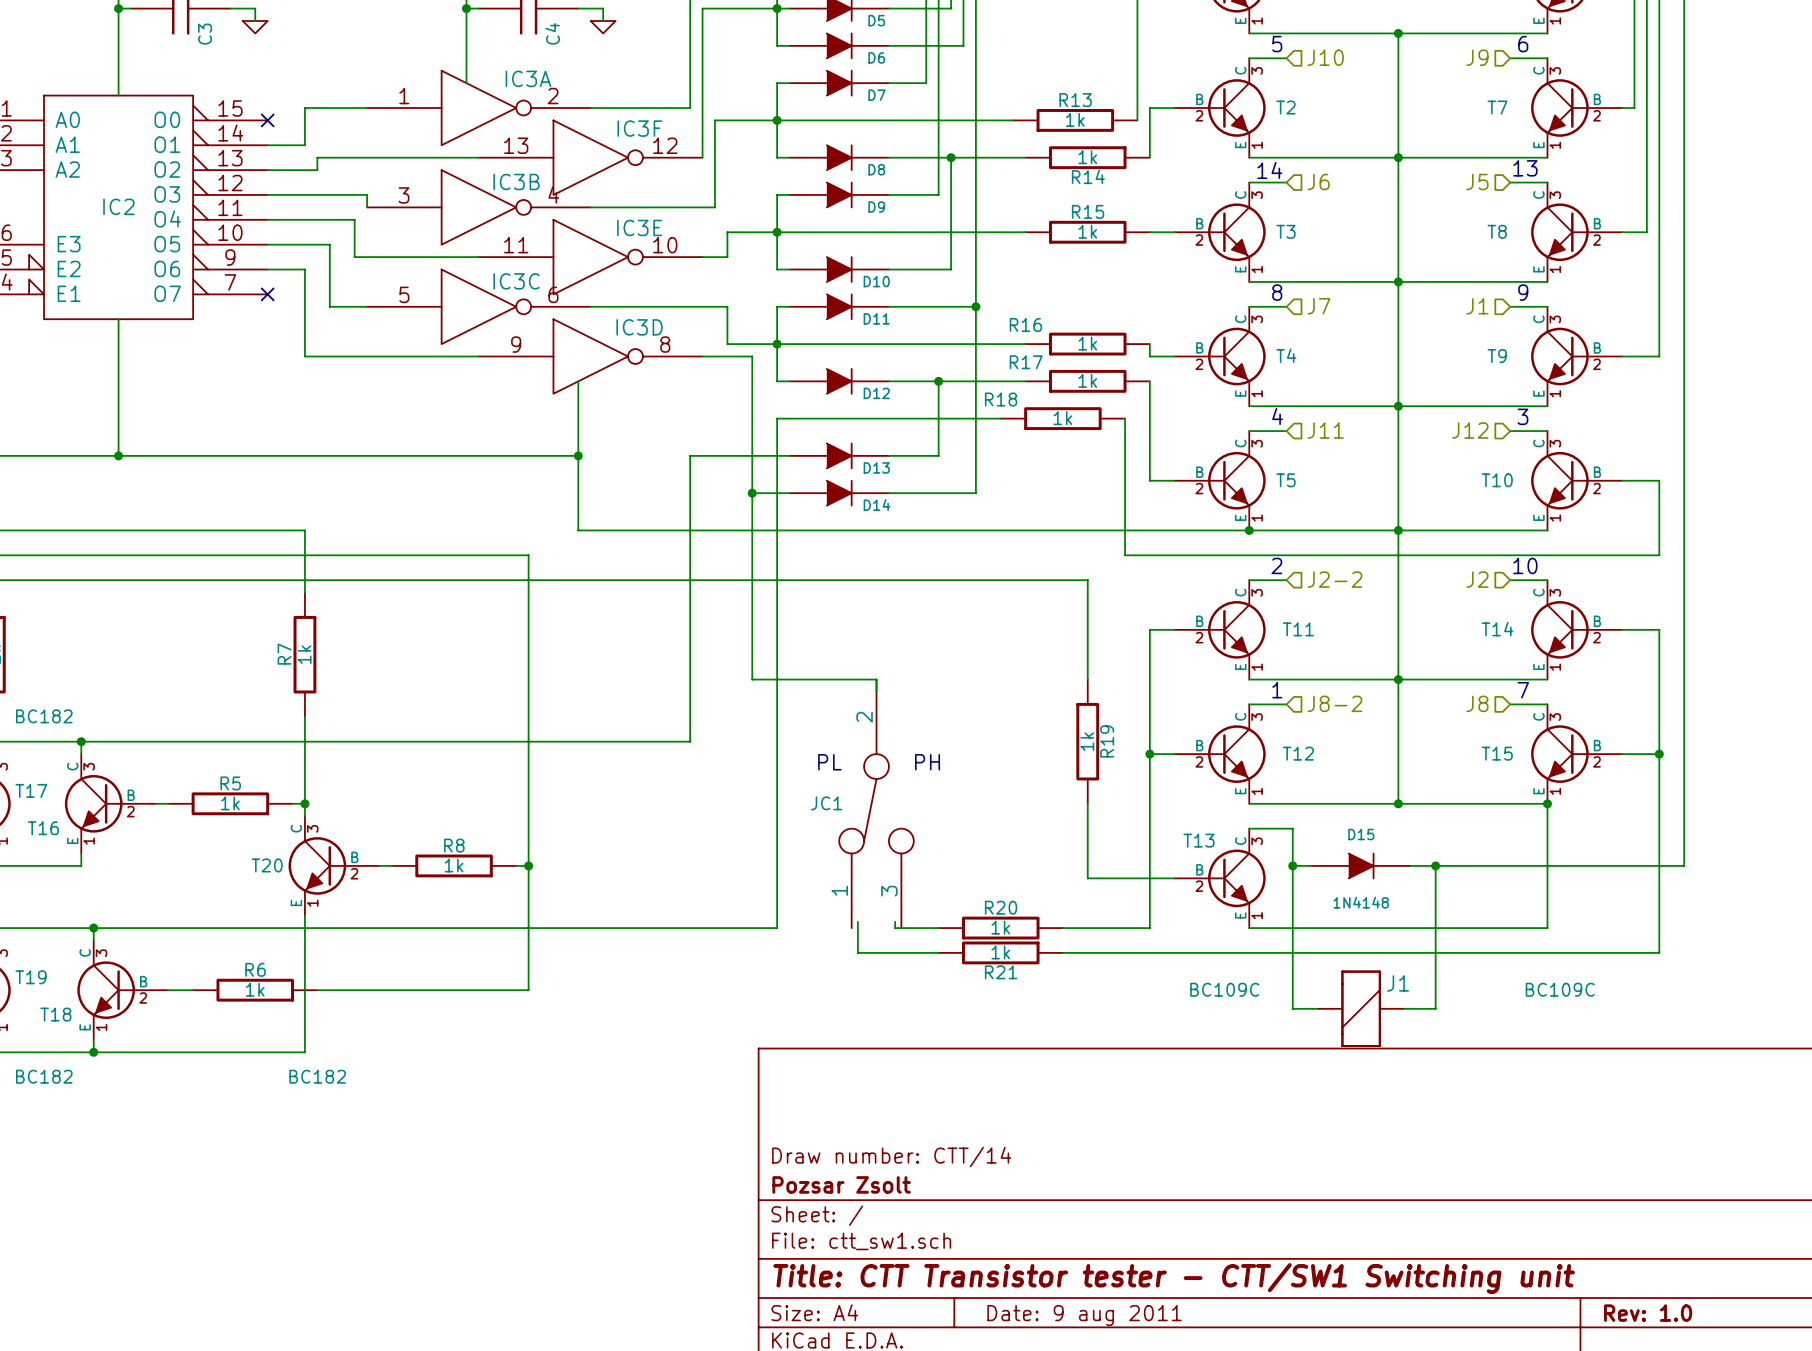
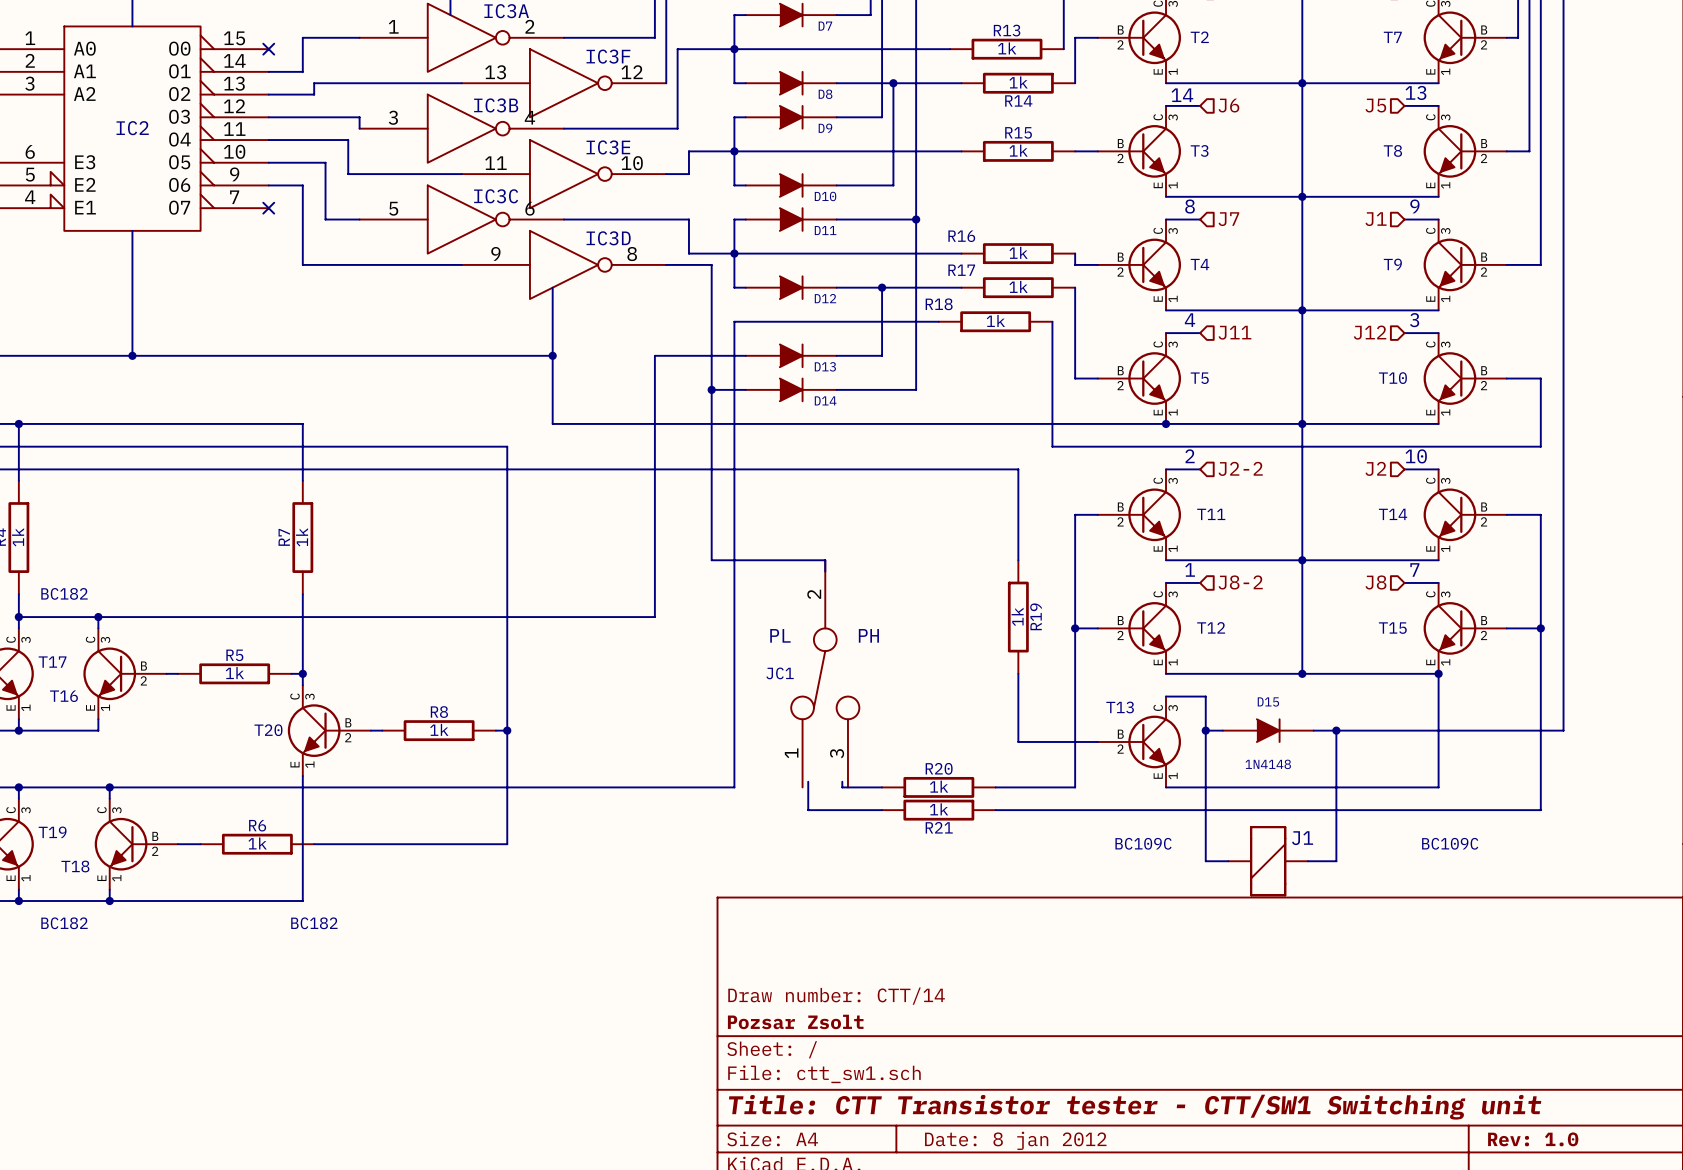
title block: Date: 9 aug 2011 (1084, 1315) -> Date: 8 jan 2012 (1015, 1140)

